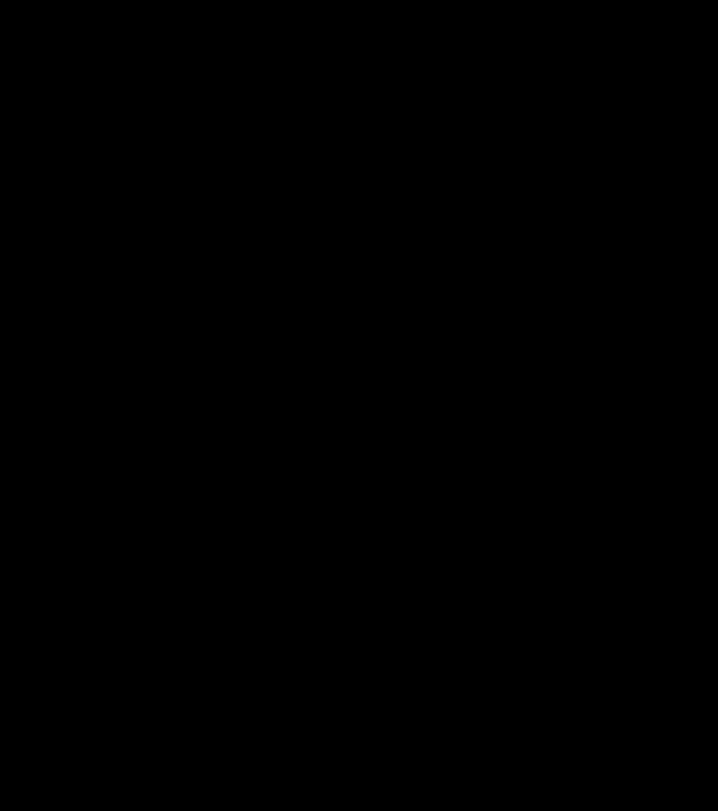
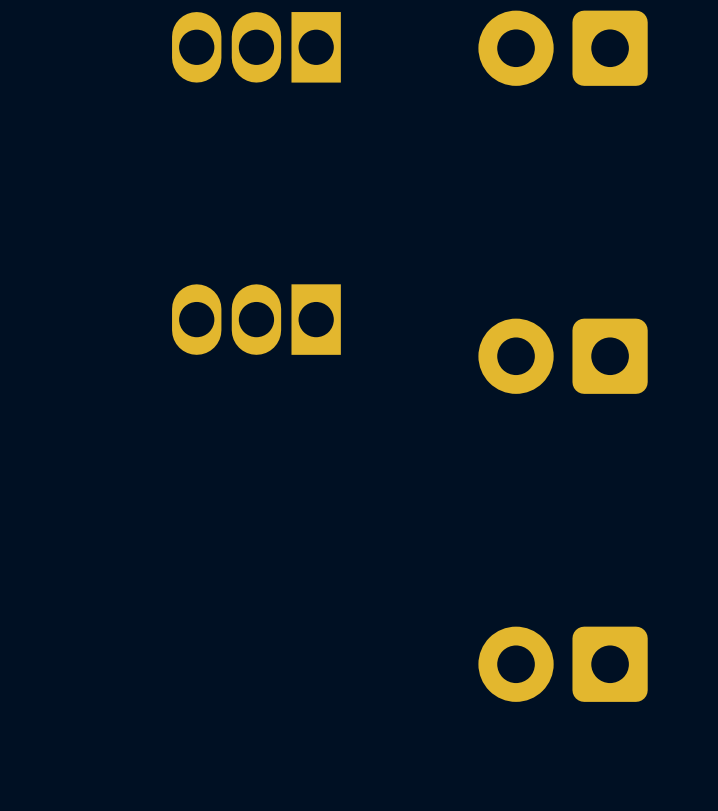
part: none -> (256, 47)
part: none -> (563, 48)
part: none -> (256, 319)
part: none -> (563, 356)
part: none -> (563, 664)

